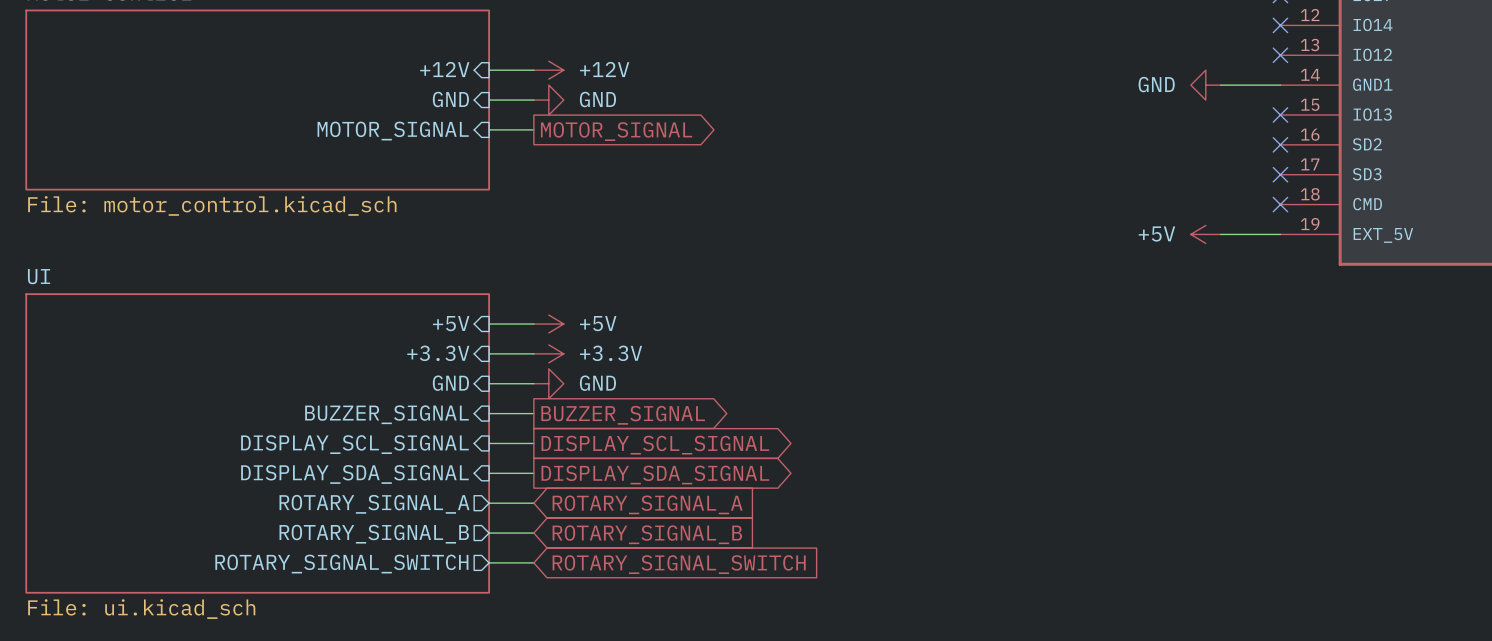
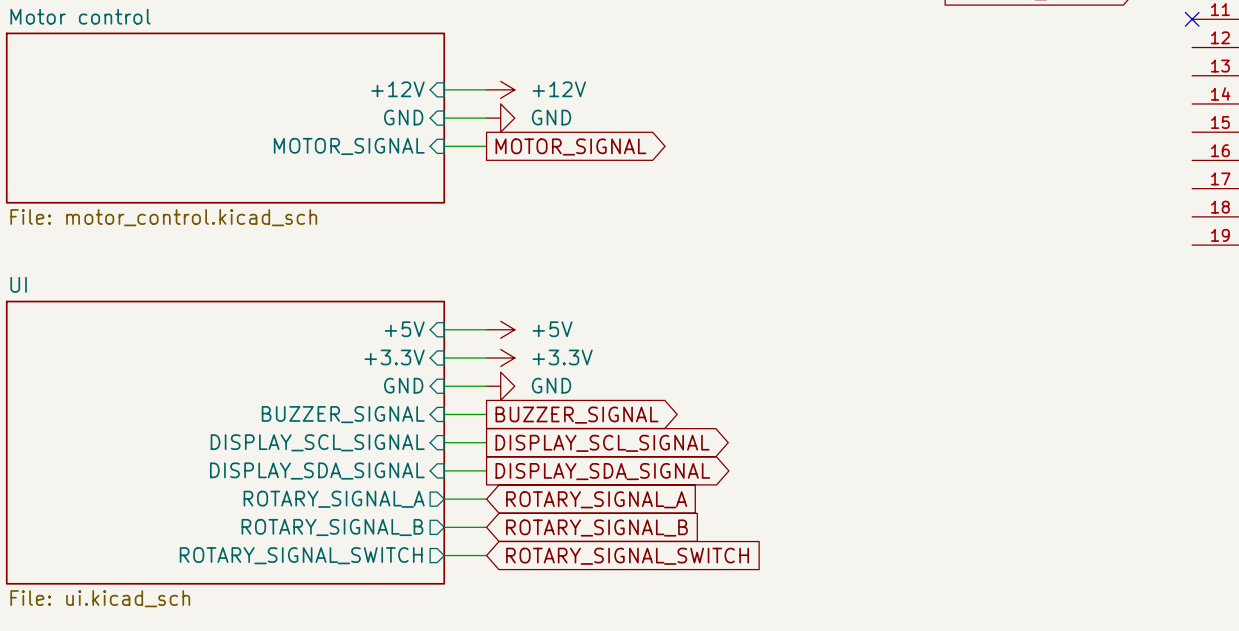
no-connect mark: (1280, 25) -> none
no-connect mark: (1280, 55) -> none
power symbol: GND (1205, 85) -> none
wire: (1220, 85) (1280, 85) -> none
no-connect mark: (1280, 114) -> none
no-connect mark: (1280, 144) -> none
no-connect mark: (1280, 174) -> none
no-connect mark: (1280, 204) -> none
power symbol: +5V (1205, 234) -> none
wire: (1220, 234) (1280, 234) -> none

